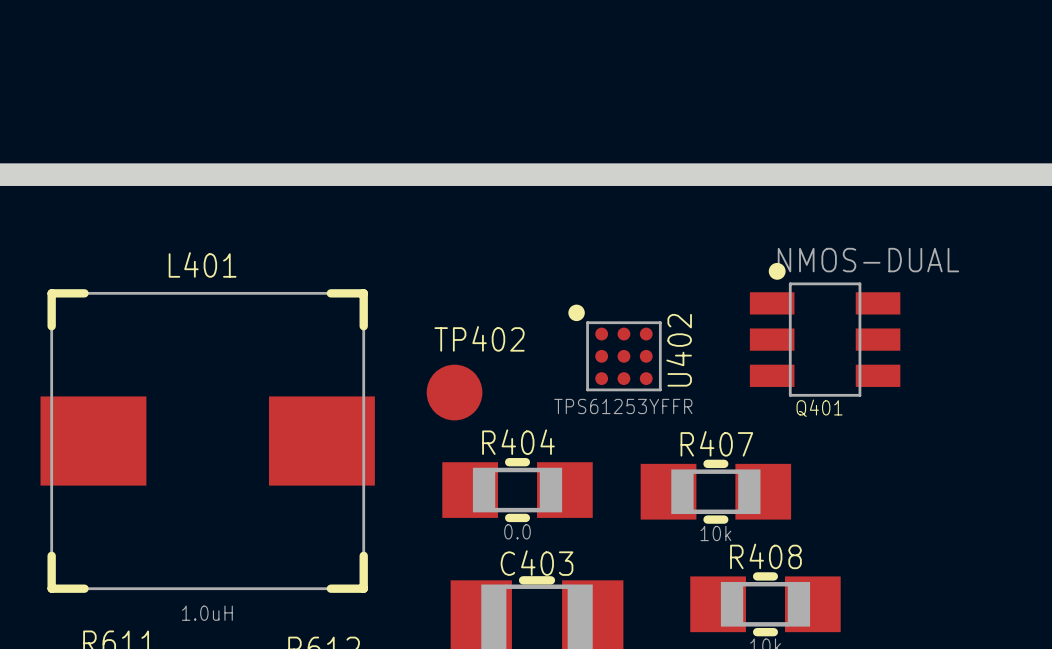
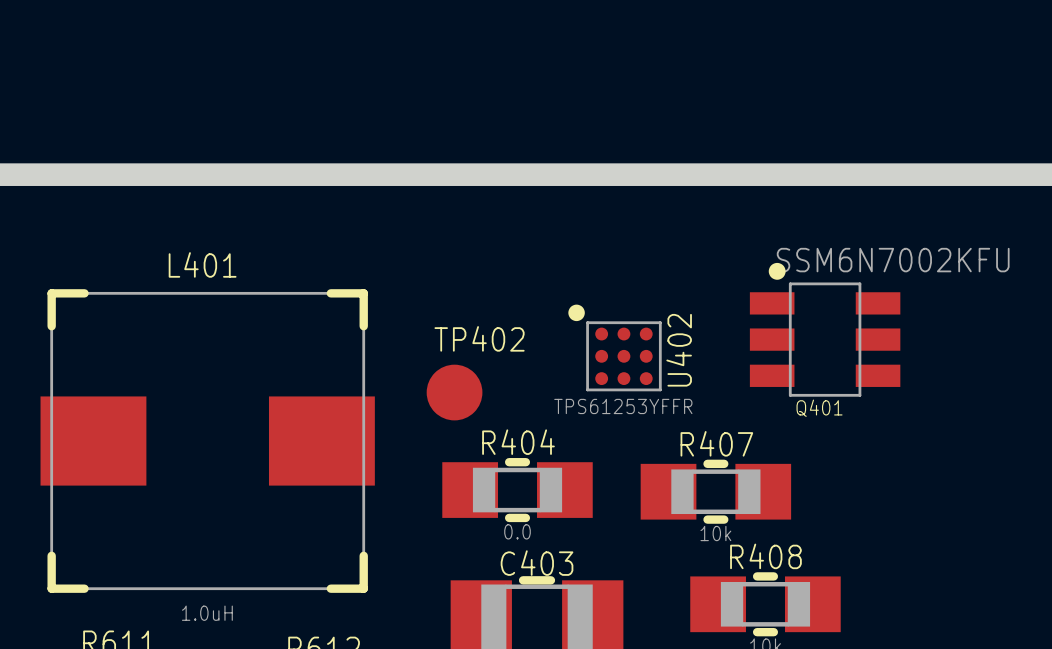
Q401 value: NMOS-DUAL (868, 260) -> SSM6N7002KFU (893, 260)

